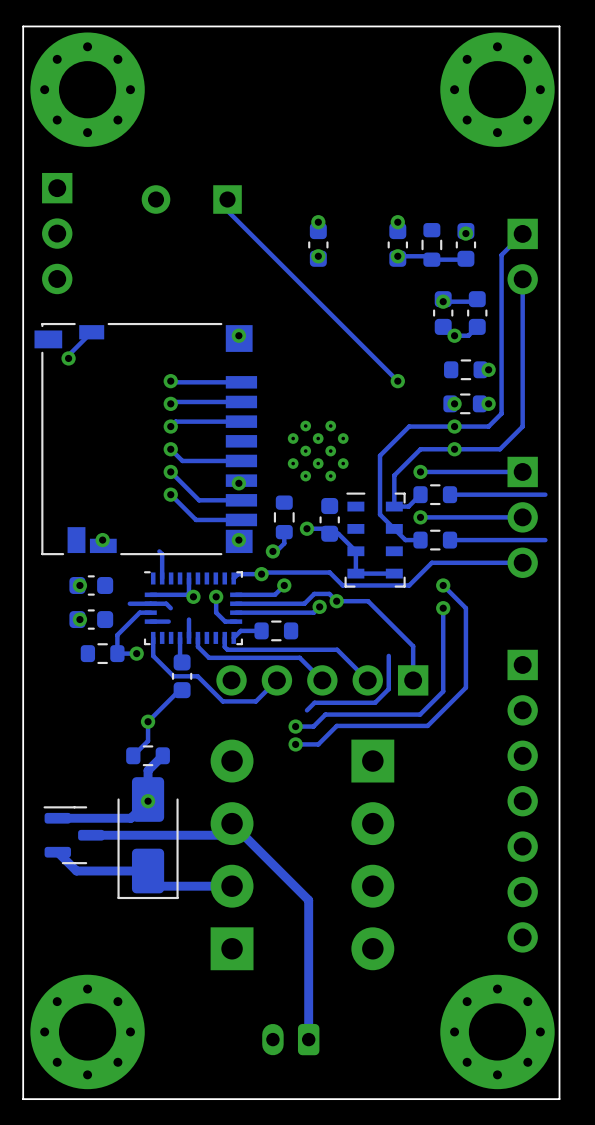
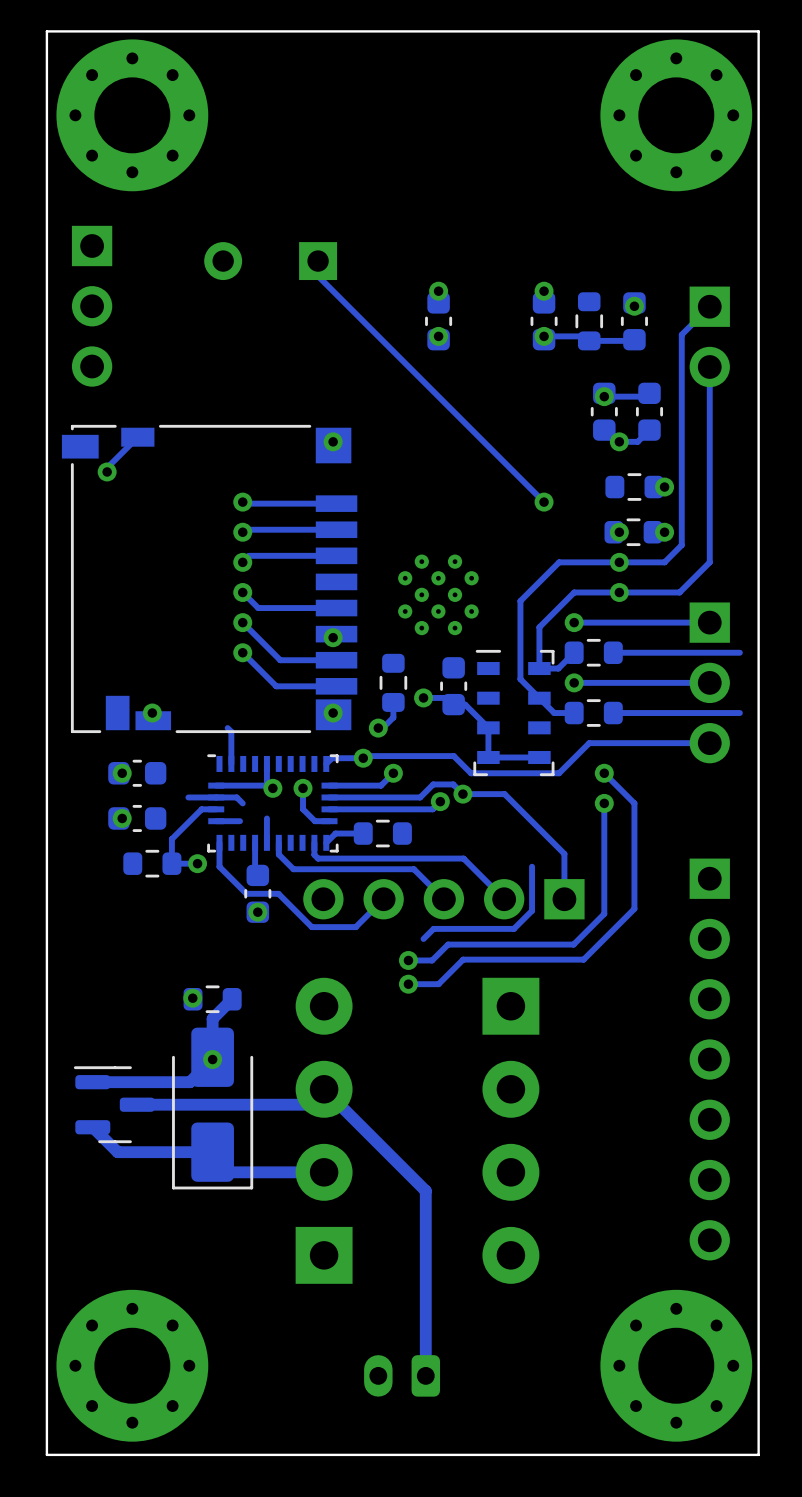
track: (179, 690) (148, 721) (148, 741) (133, 755) -> none
via: none -> (257, 912)
via: (148, 721) -> none
via: none -> (192, 998)

